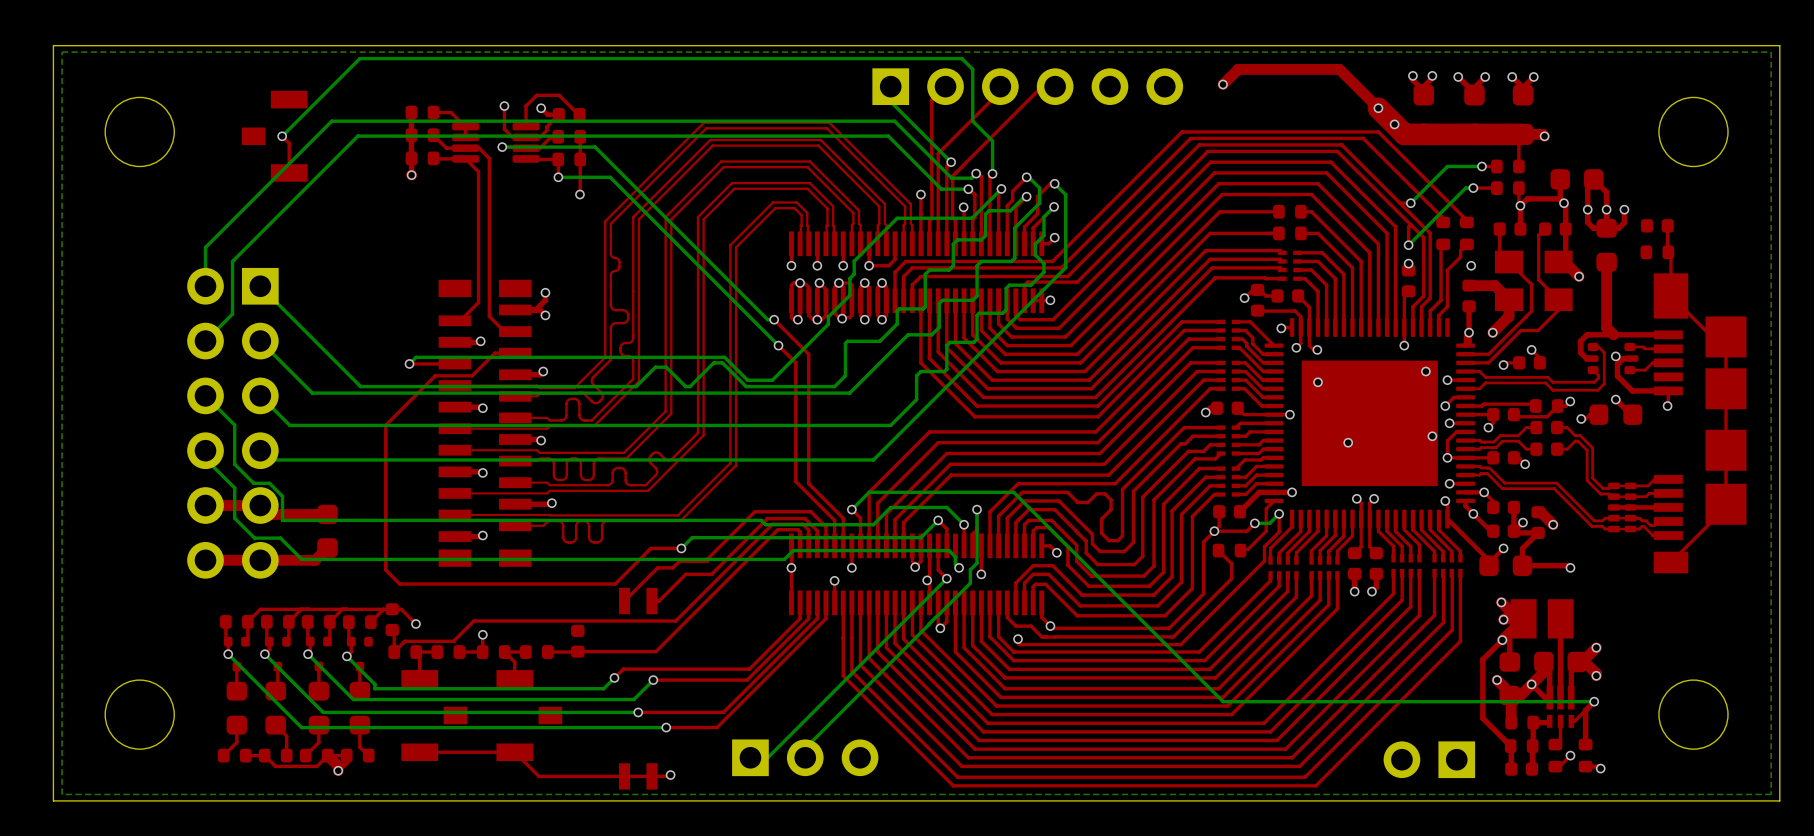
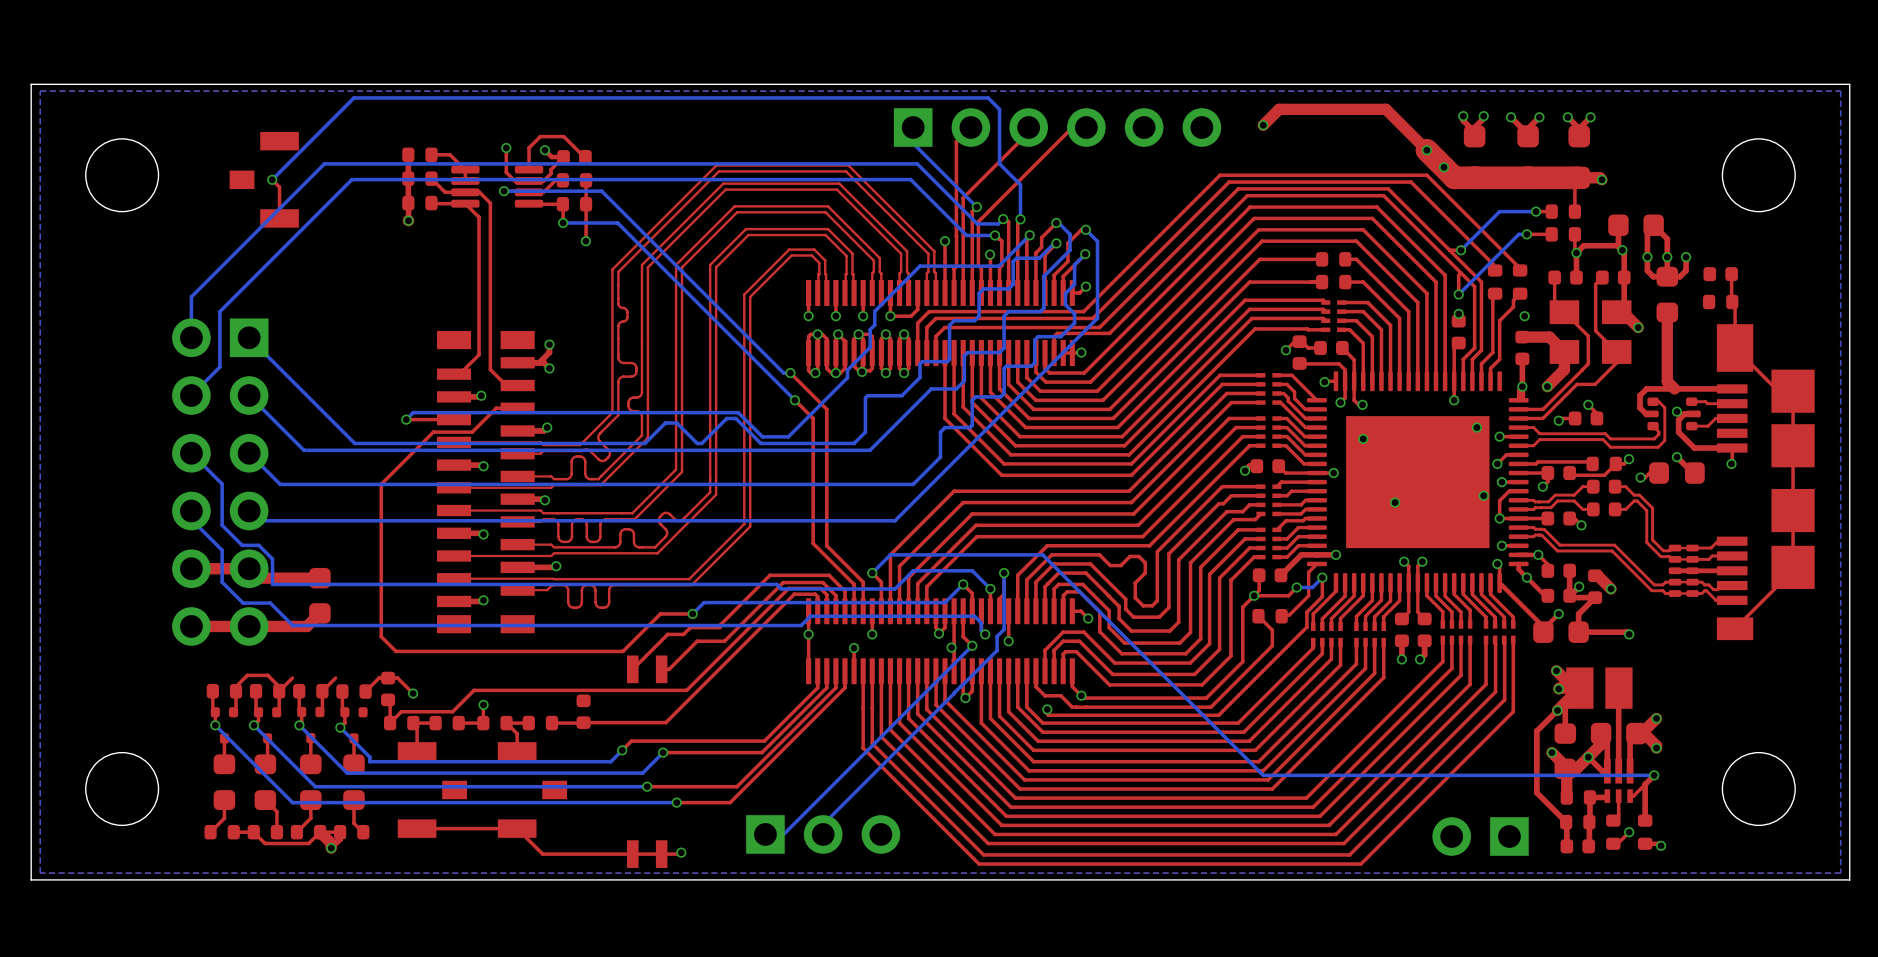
top track: (383, 609) (260, 609) (247, 621) -> (279, 686) (267, 675) (247, 675) (236, 686) (236, 691)

